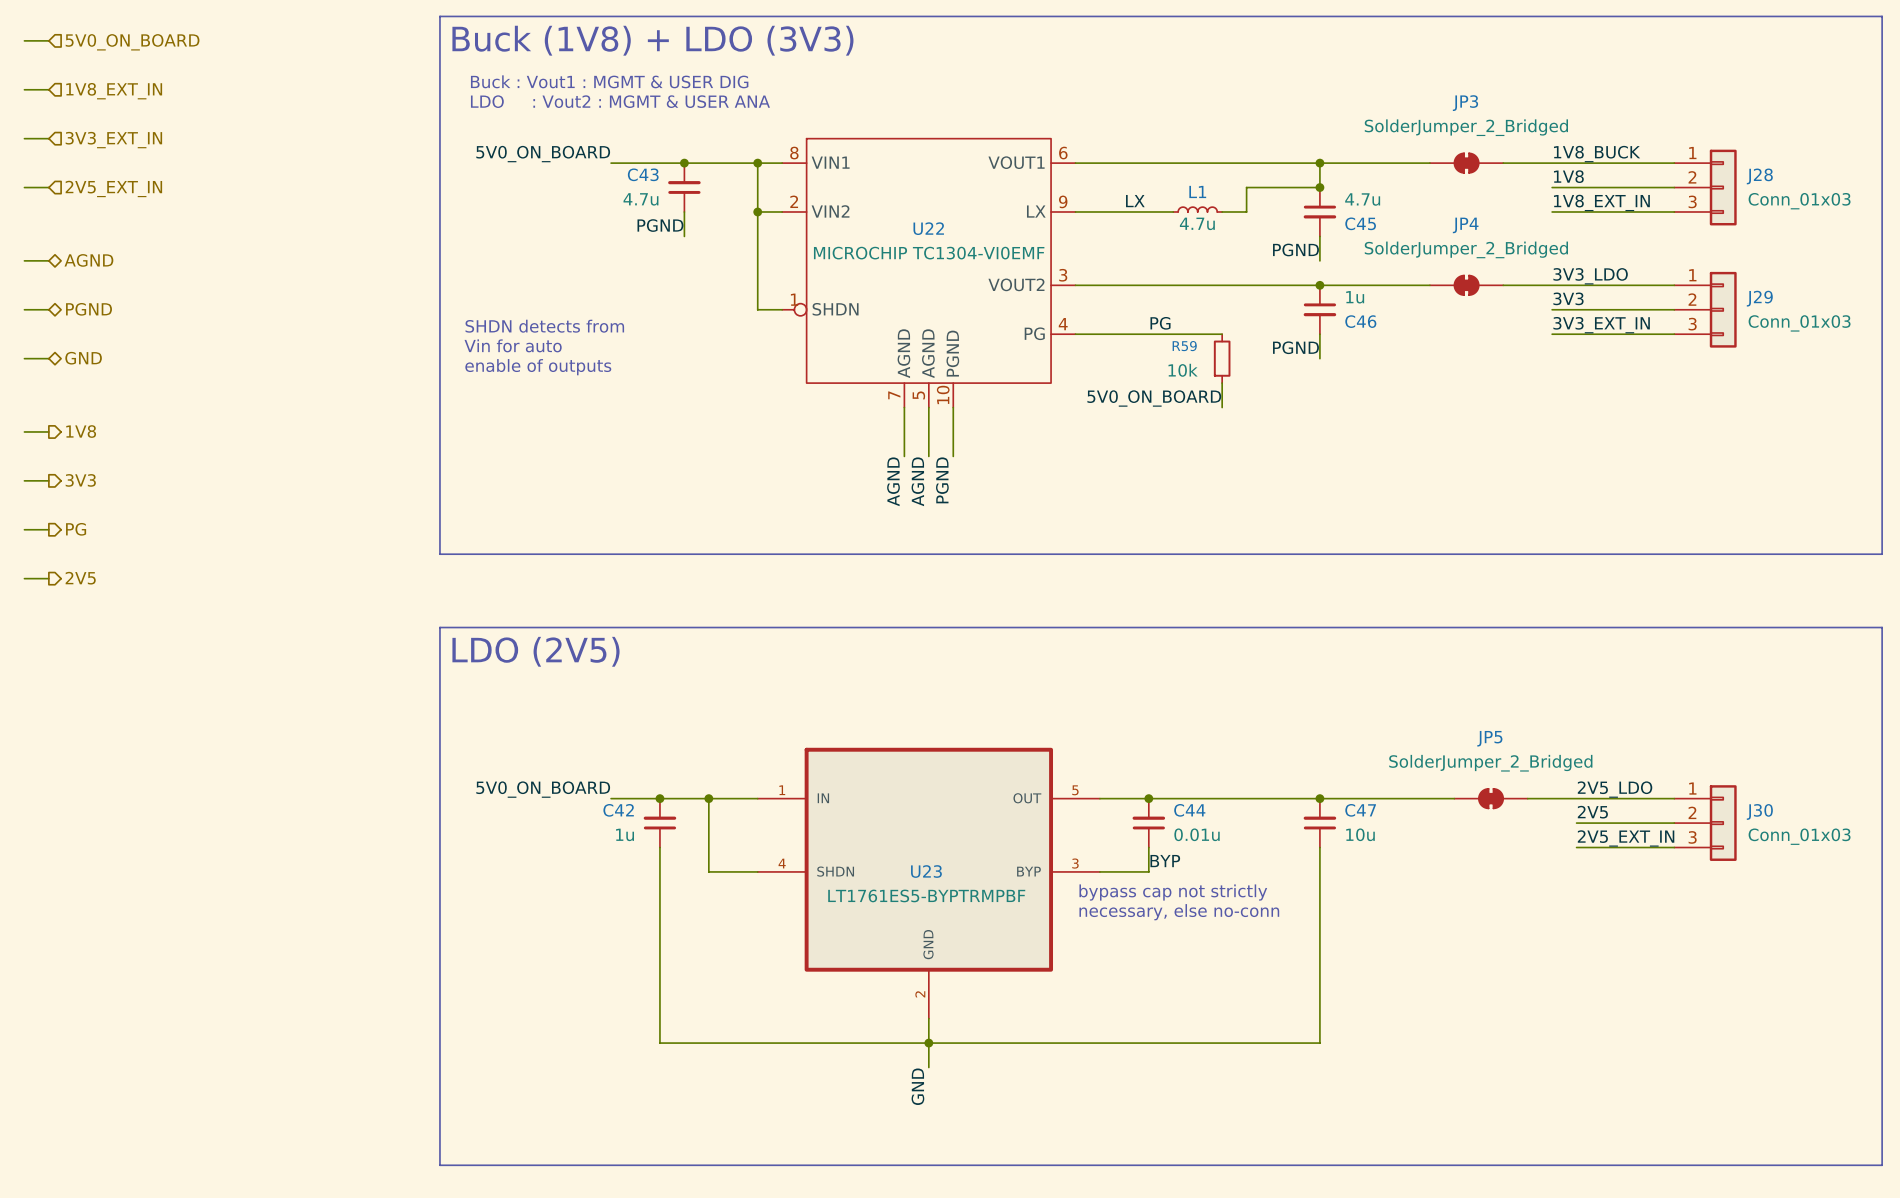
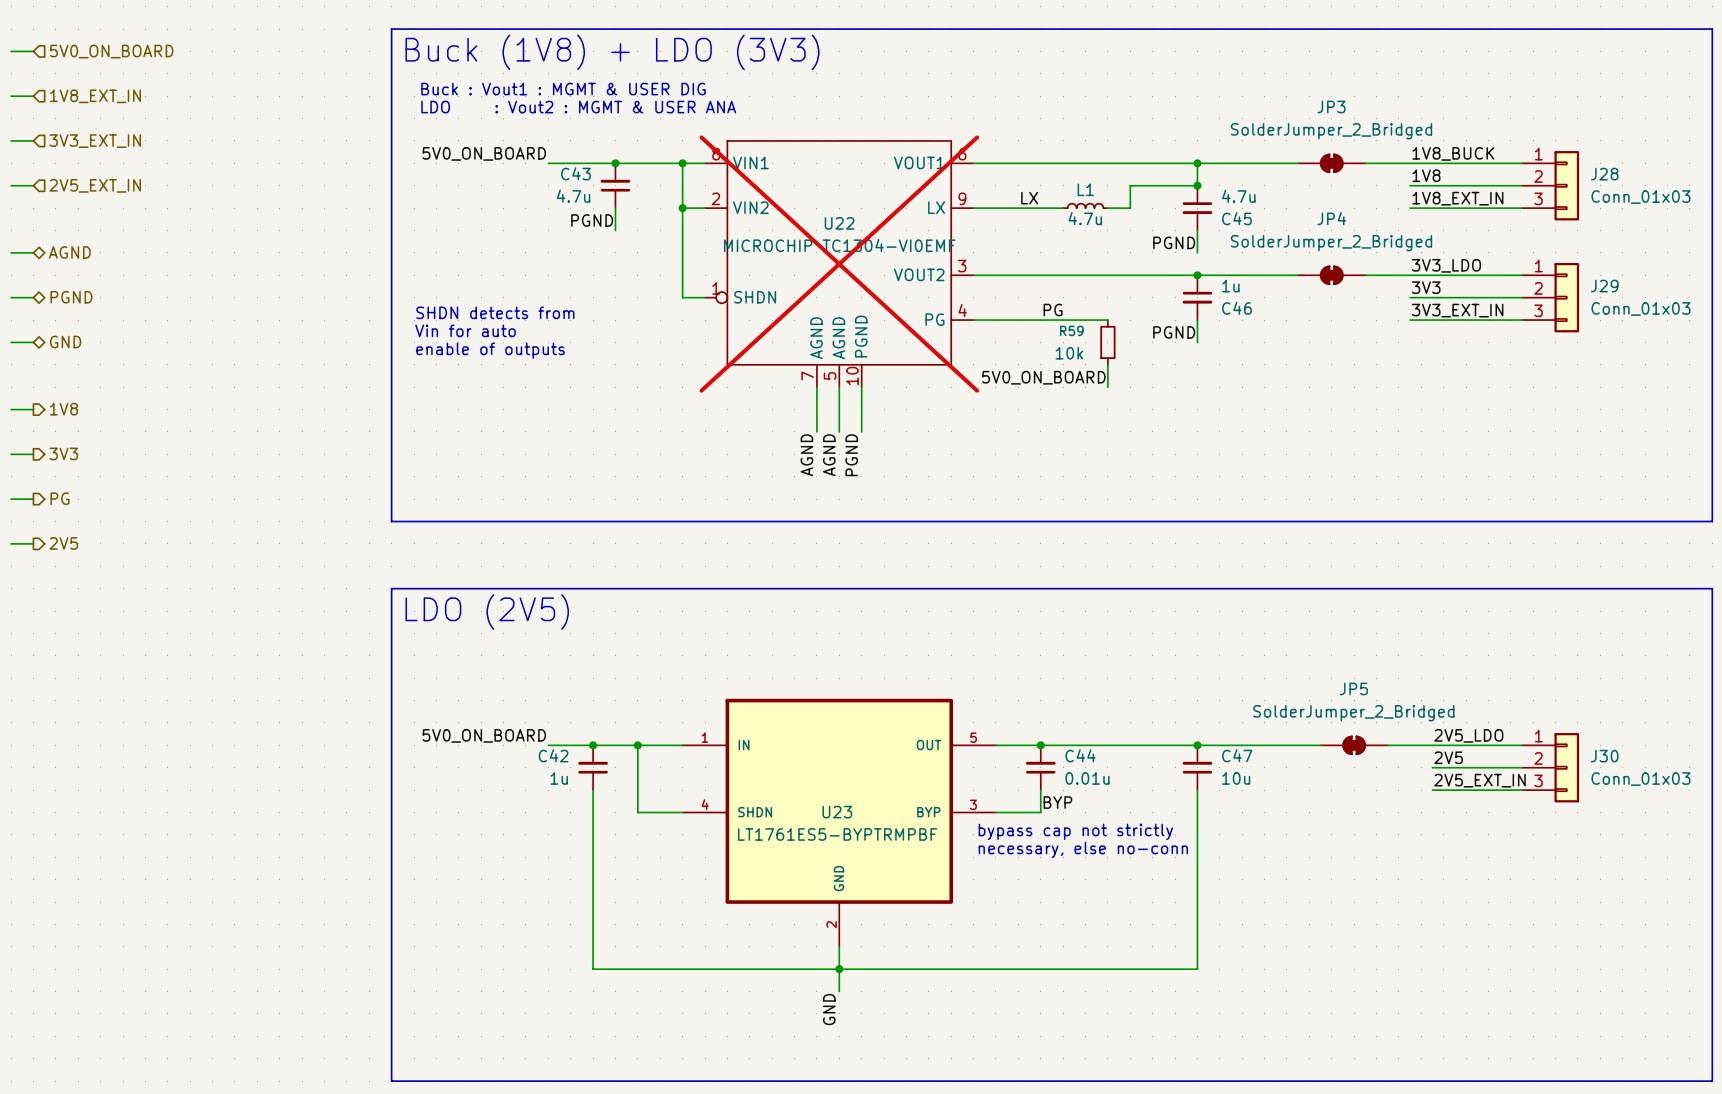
U22 do-not-place cross: none -> (839, 264)

